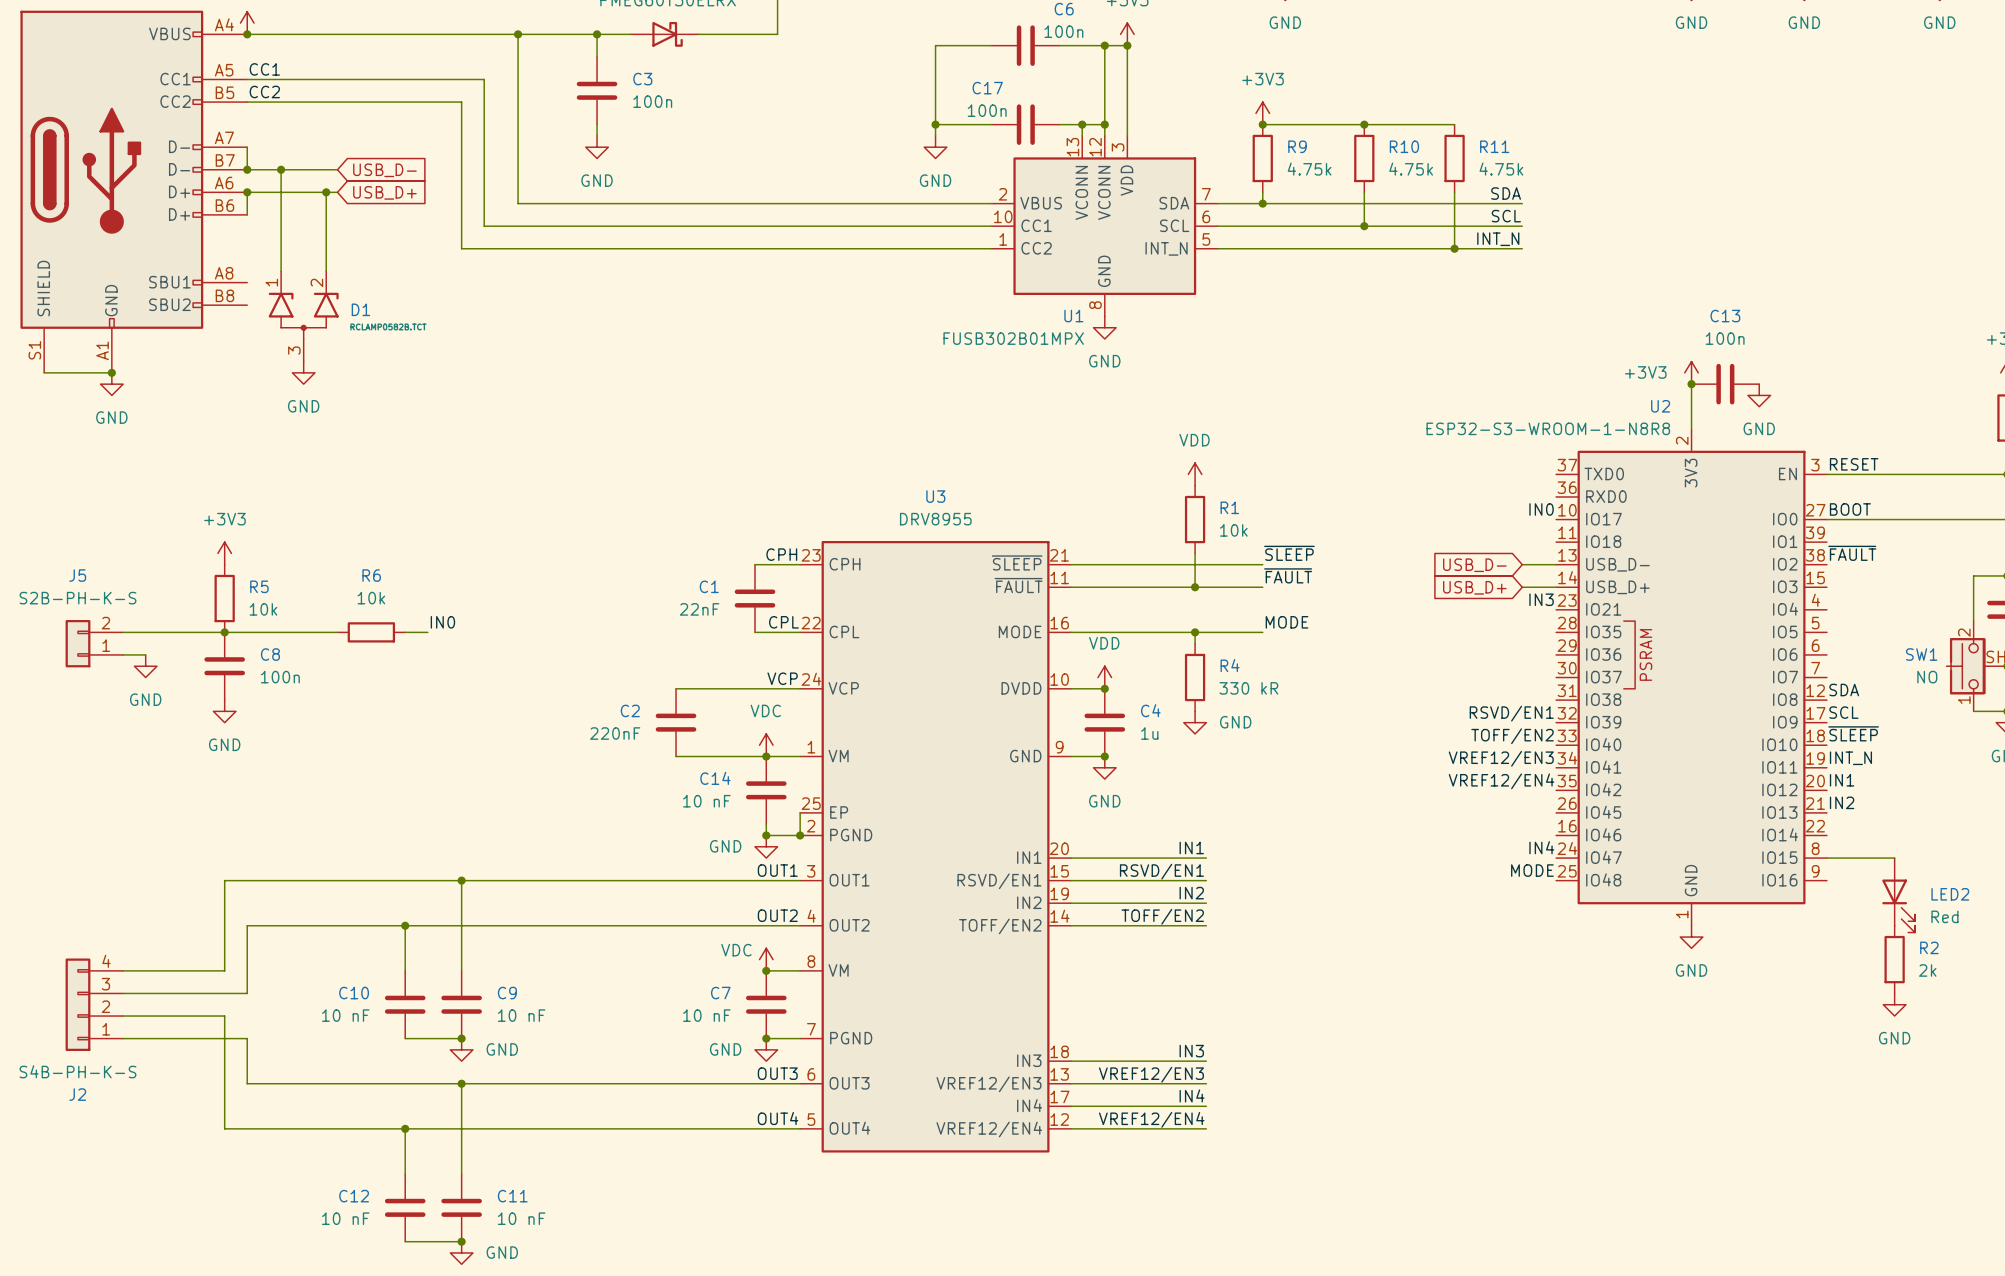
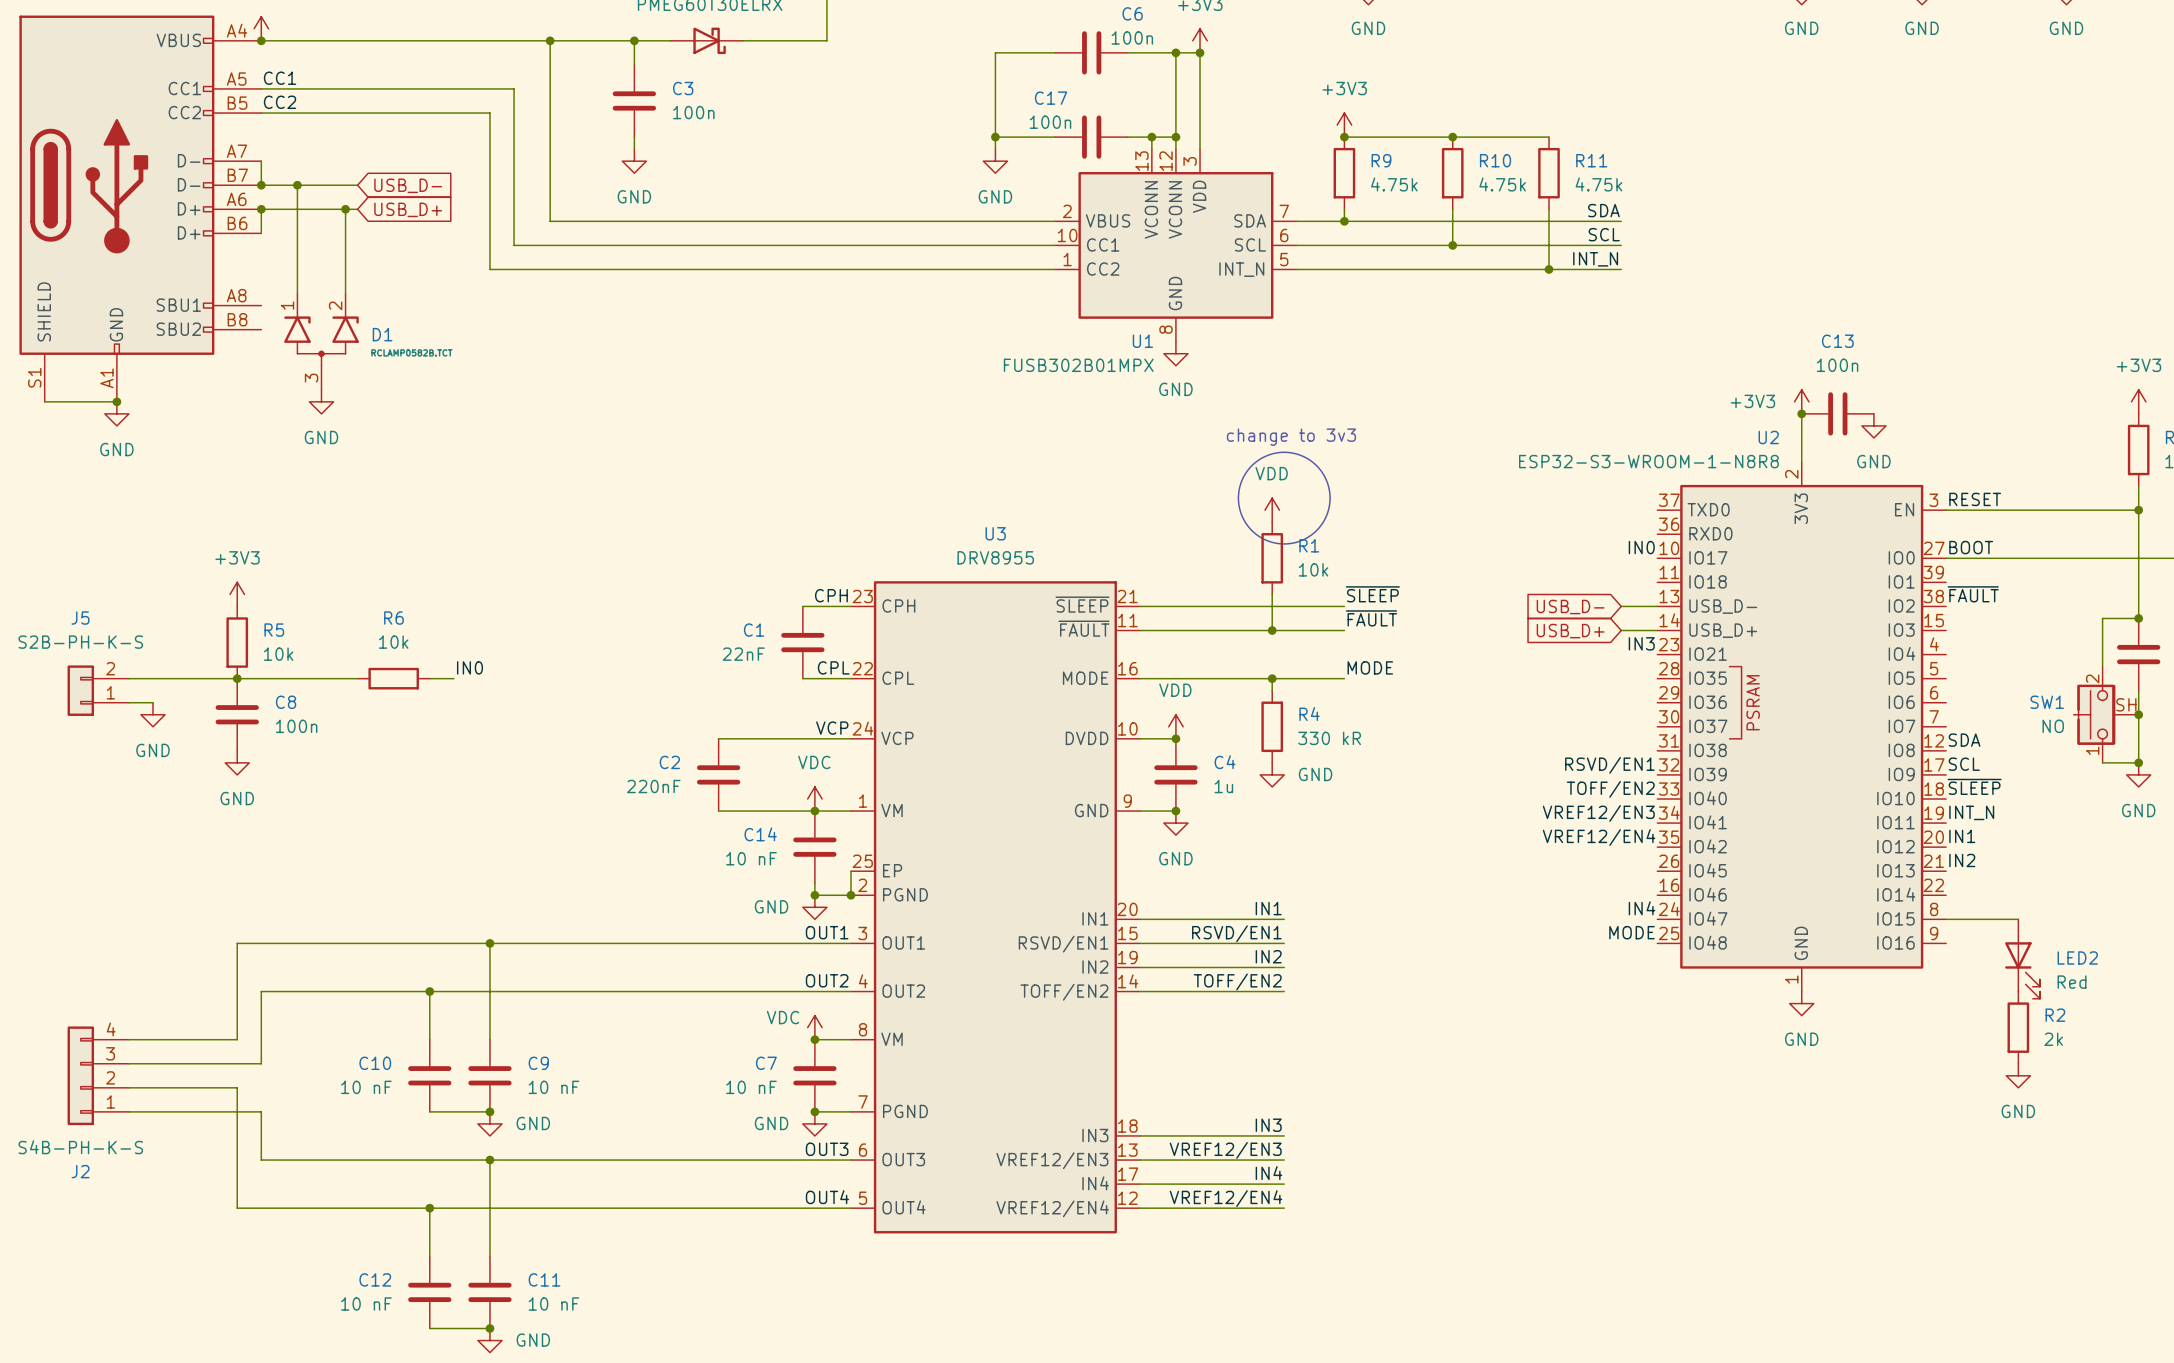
text: none -> change to 3v3 (1291, 437)
drawing: none -> [1238, 452, 1331, 544]

